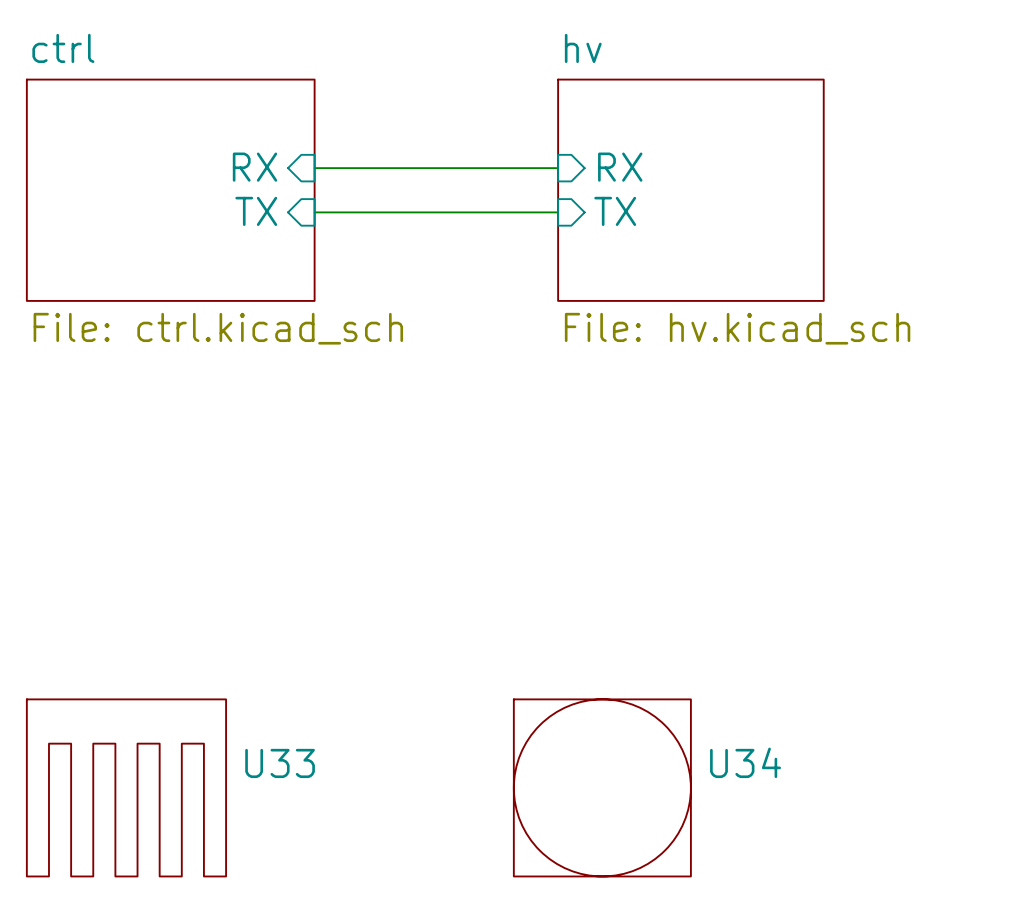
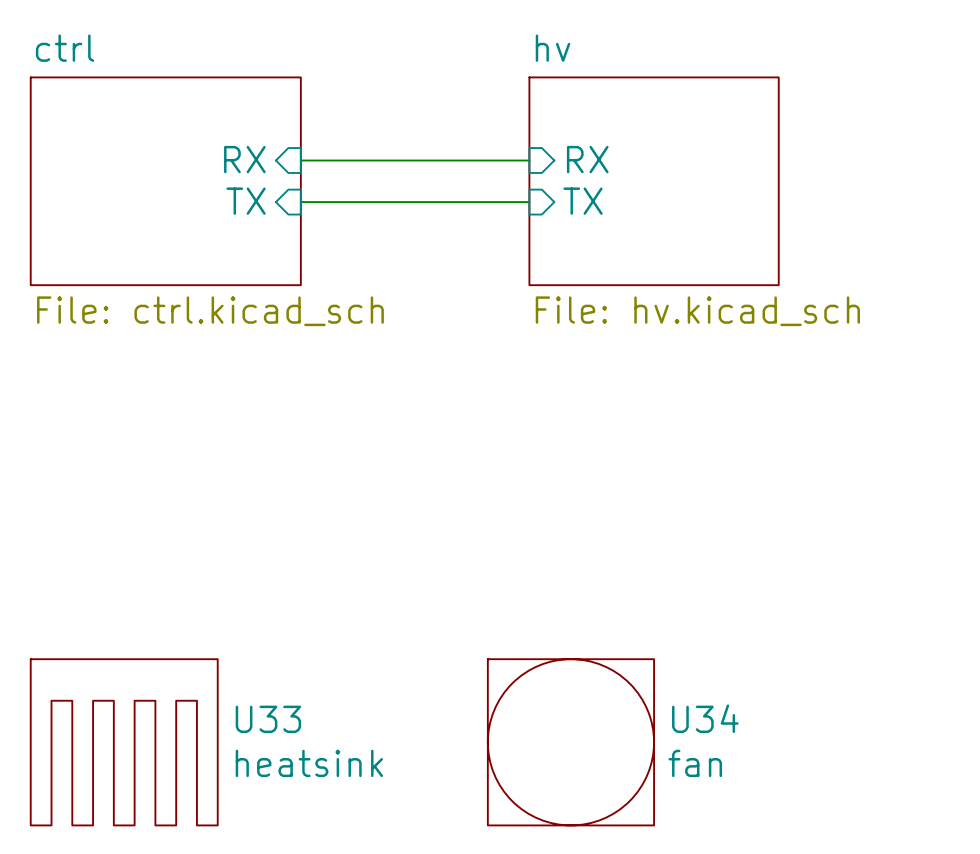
U33 value: none -> heatsink (309, 763)
U34 value: none -> fan (695, 763)

